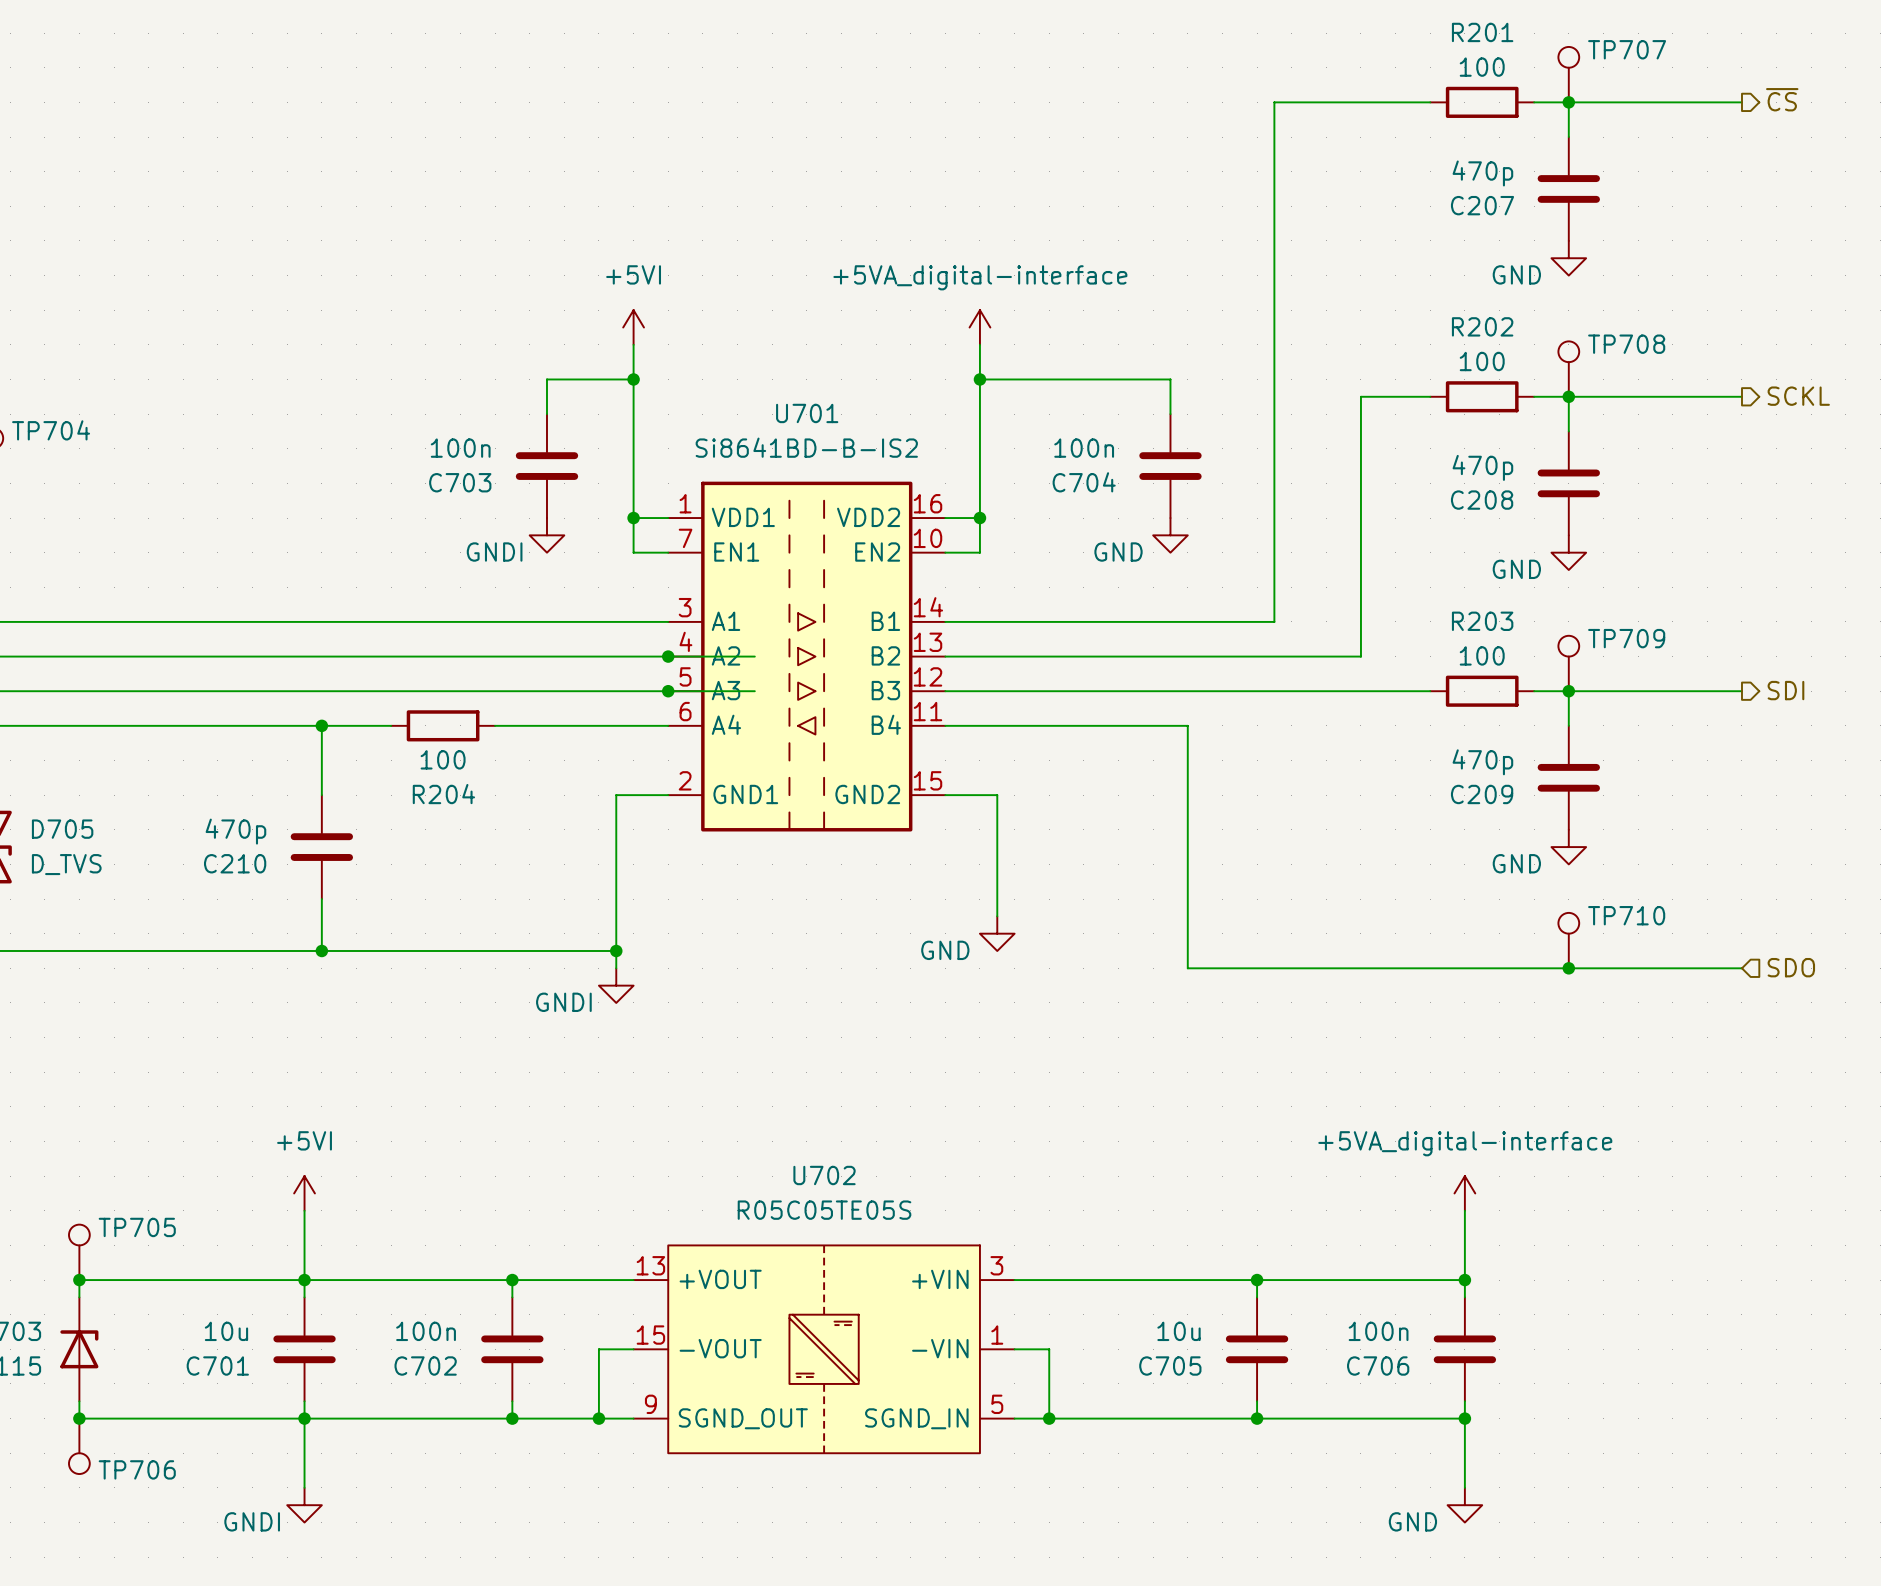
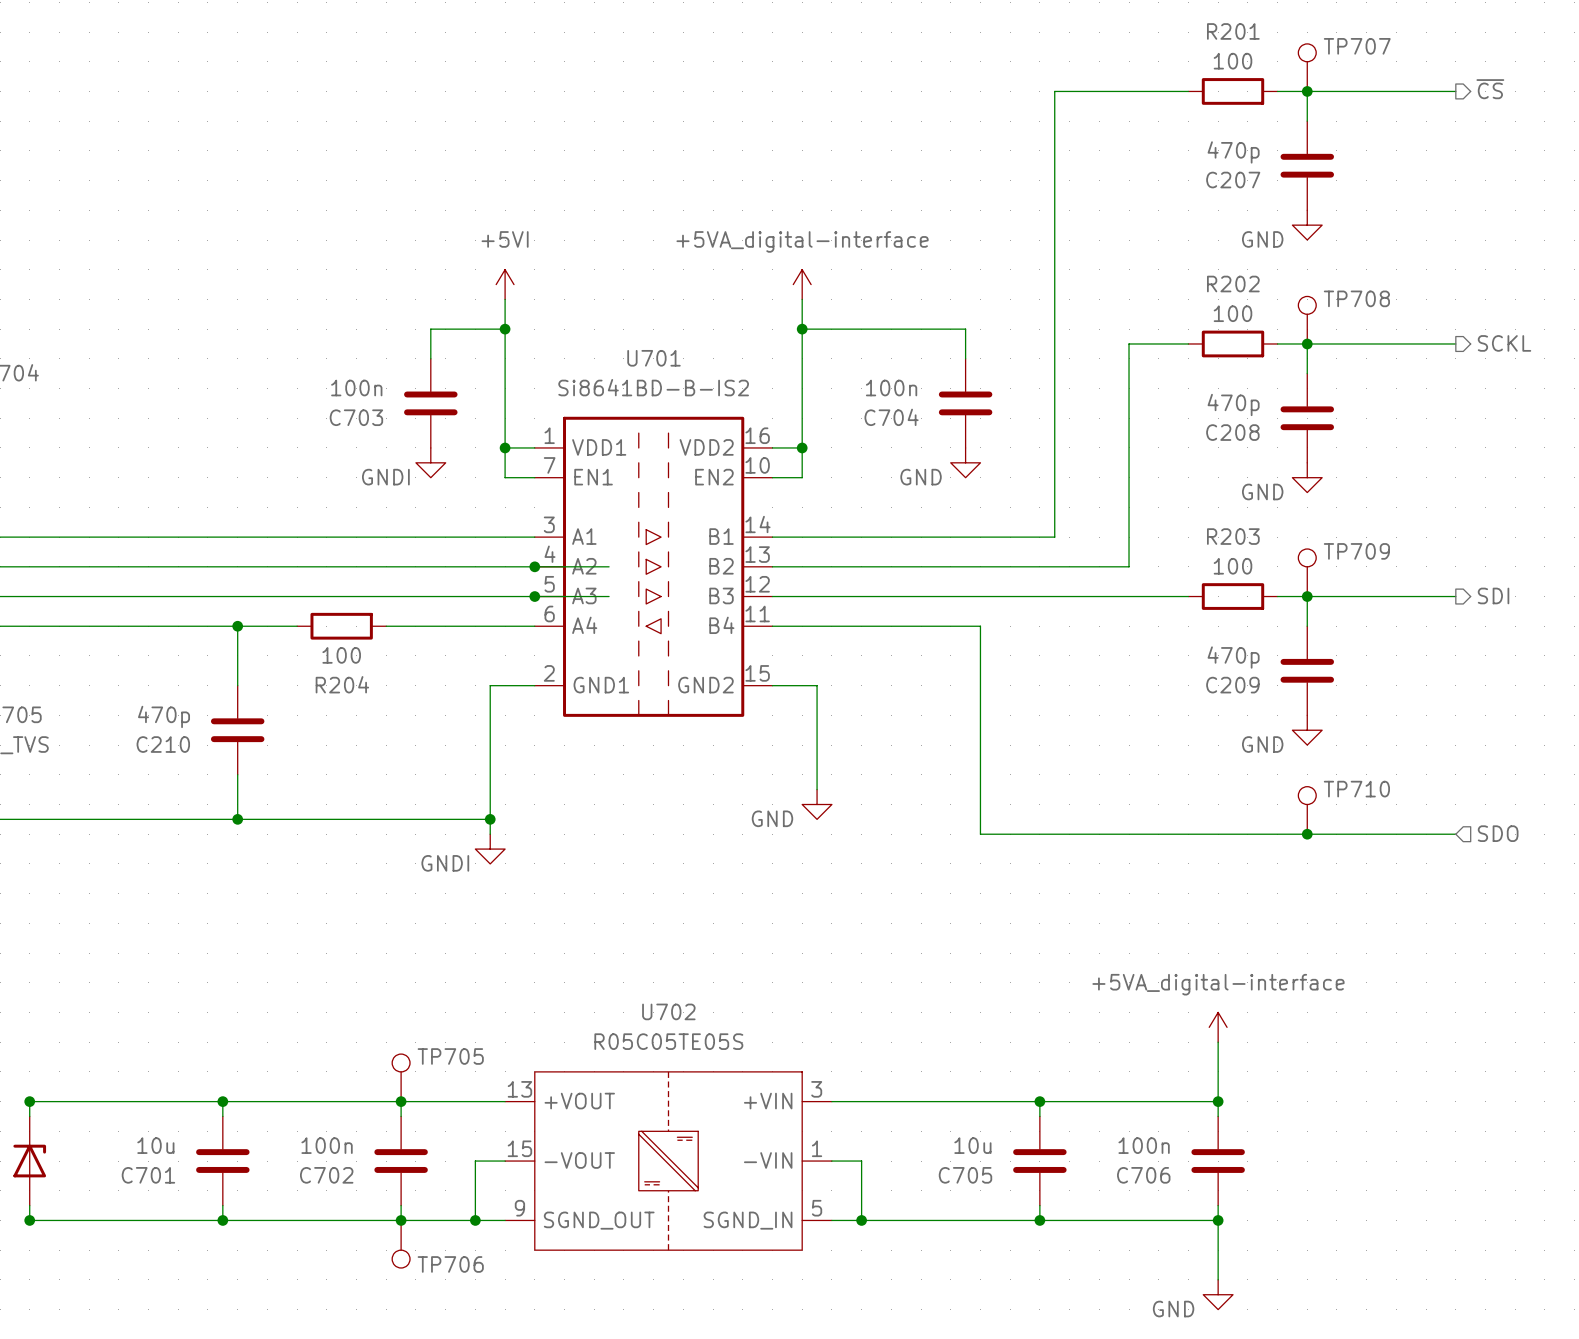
power symbol: +5VI (304, 1193) -> none
wire: (304, 1210) (304, 1280) -> none
TP705 position: (79, 1252) -> (401, 1077)
wire: (304, 1418) (304, 1487) -> none
TP706 position: (79, 1446) -> (401, 1244)
power symbol: GNDI (304, 1505) -> none

